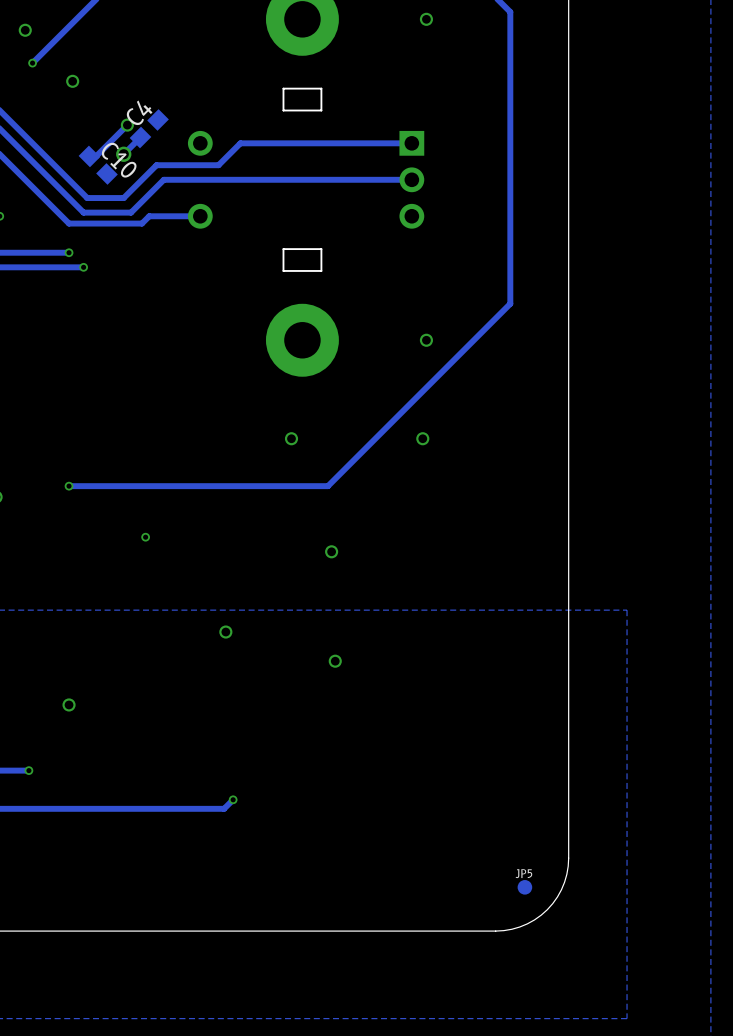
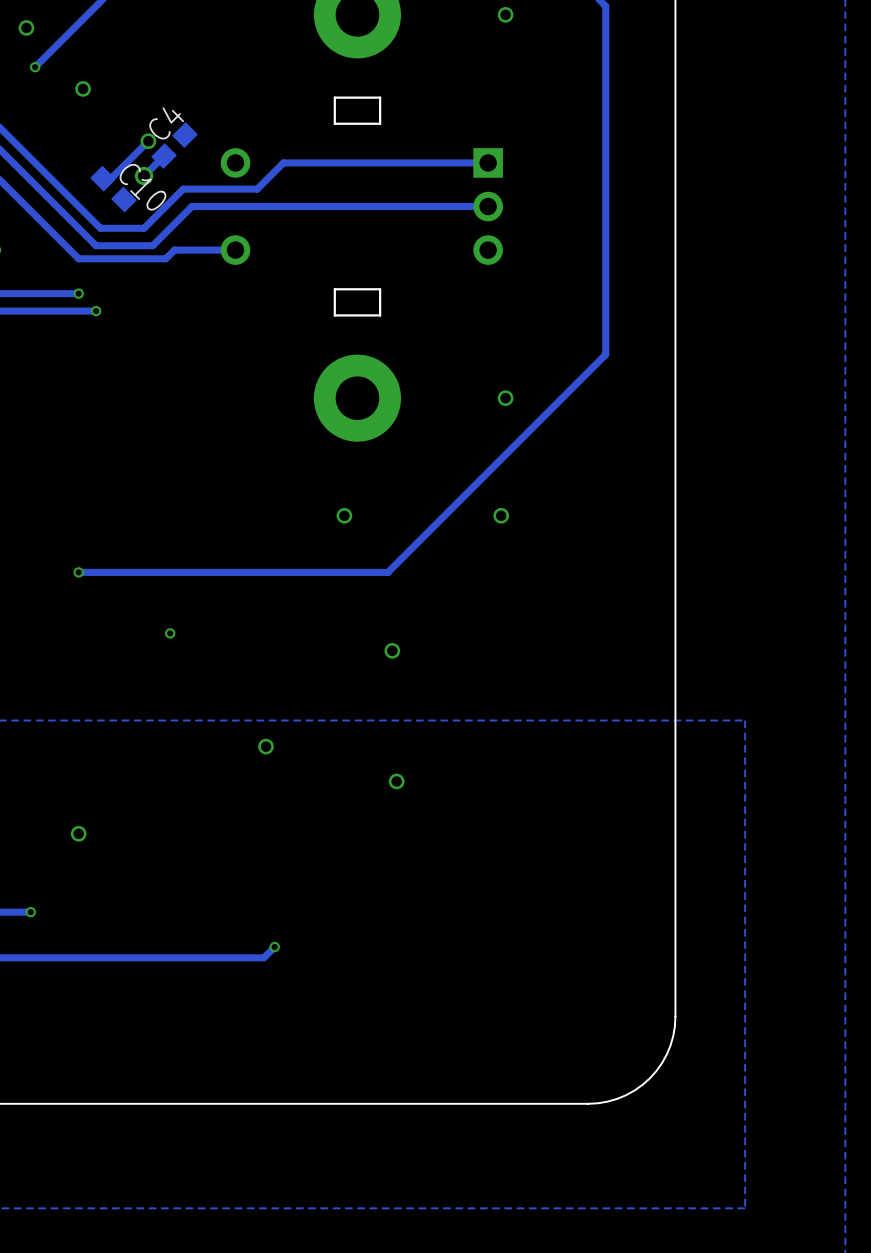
JP5: (524, 887) -> none

